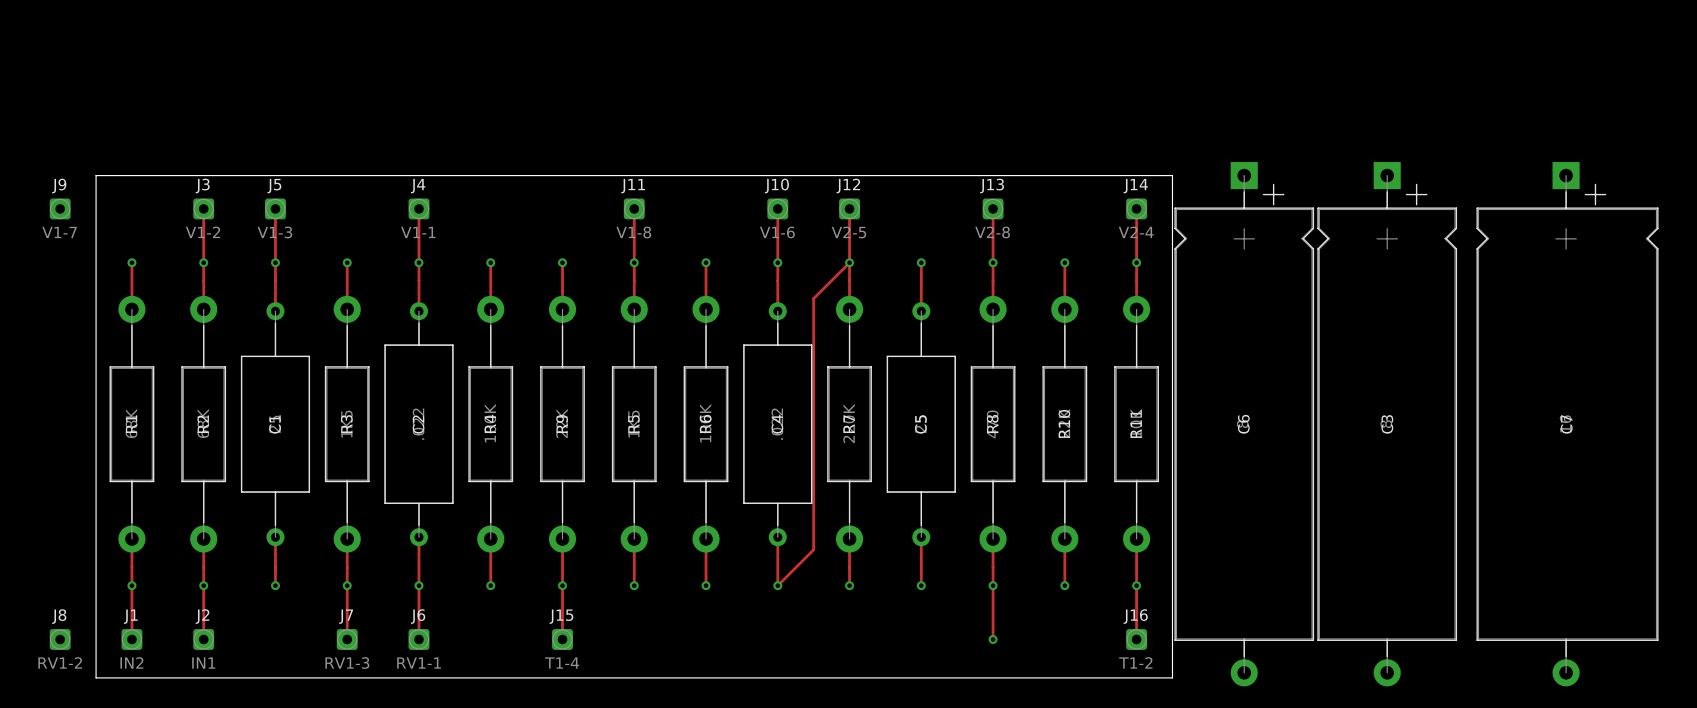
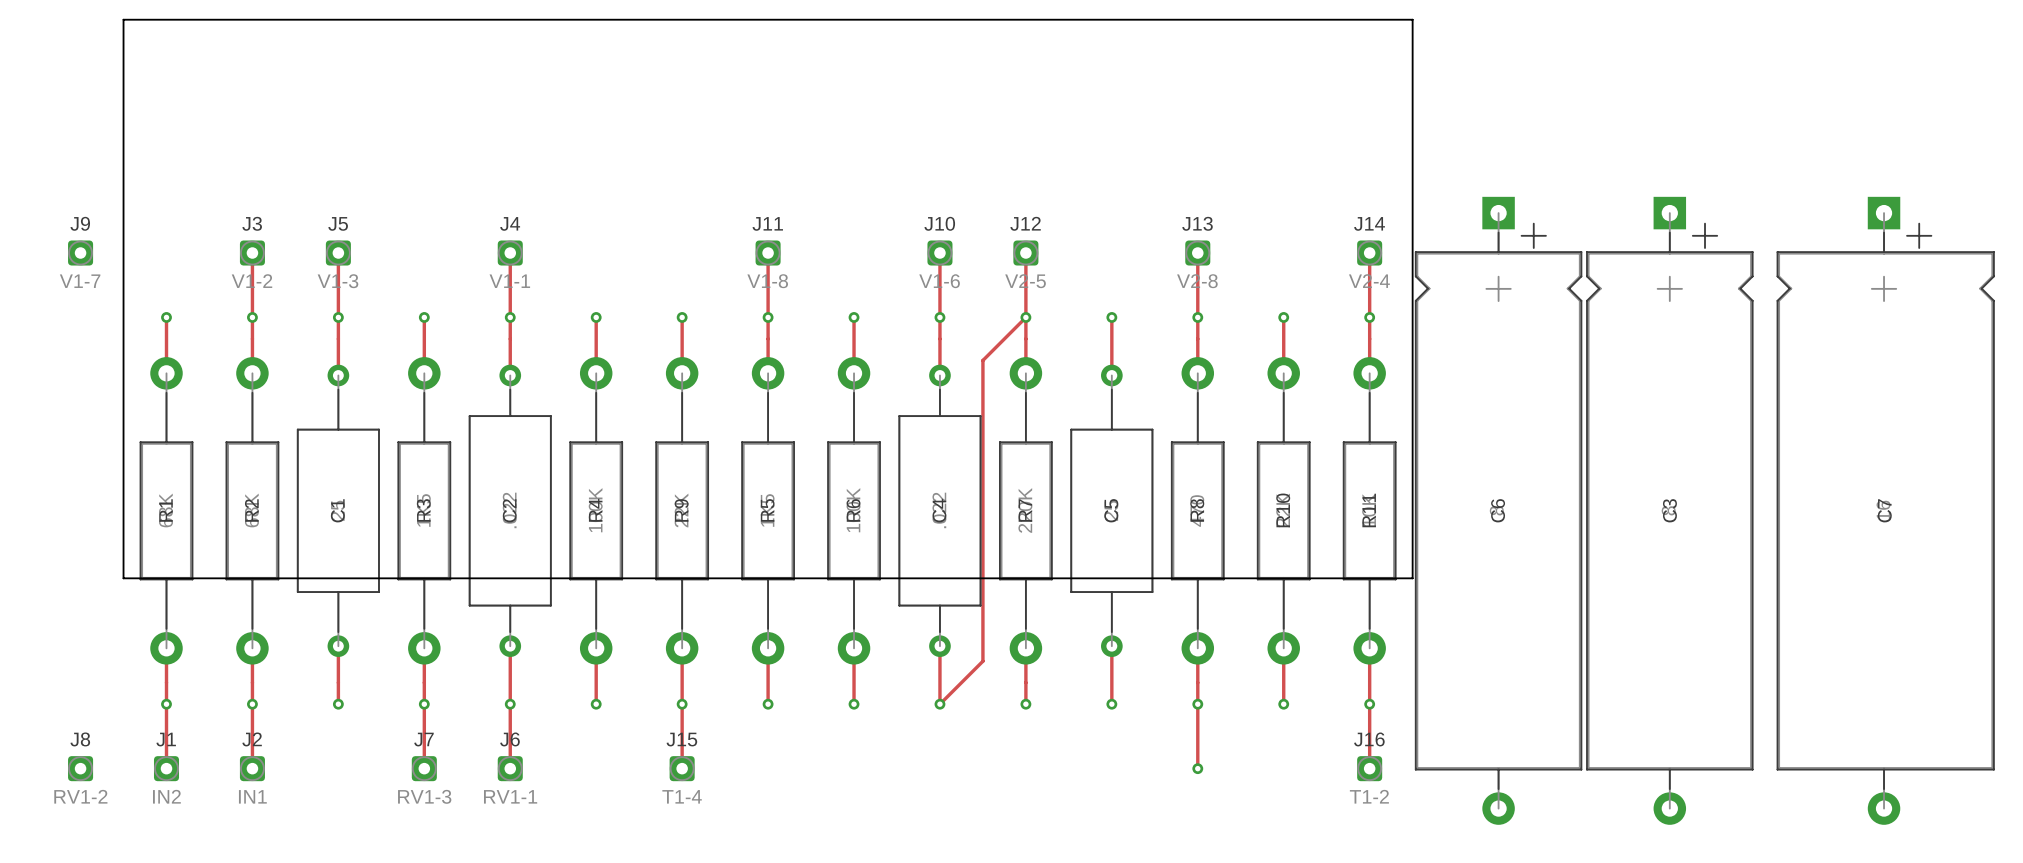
board edge: (96, 175) (1172, 175) -> (123, 213) (123, 19) (1412, 19) (1412, 213)
board edge: (96, 480) (96, 677) (1172, 677) (1172, 480) -> (123, 578) (1412, 578)

